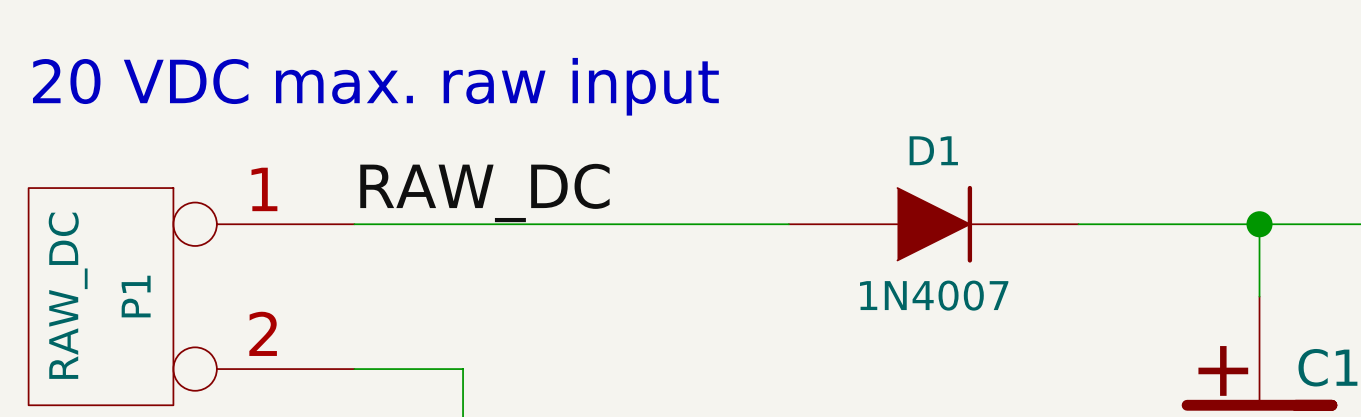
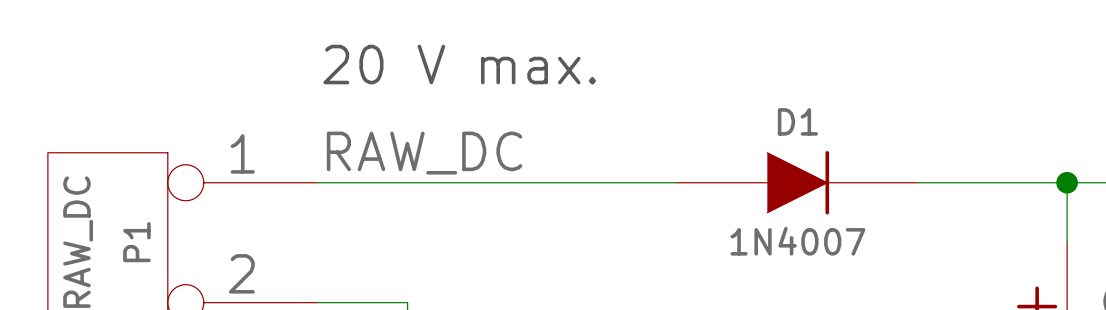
text: none -> 20 V max. (459, 64)
text: 20 VDC max. raw input (375, 86) -> none

